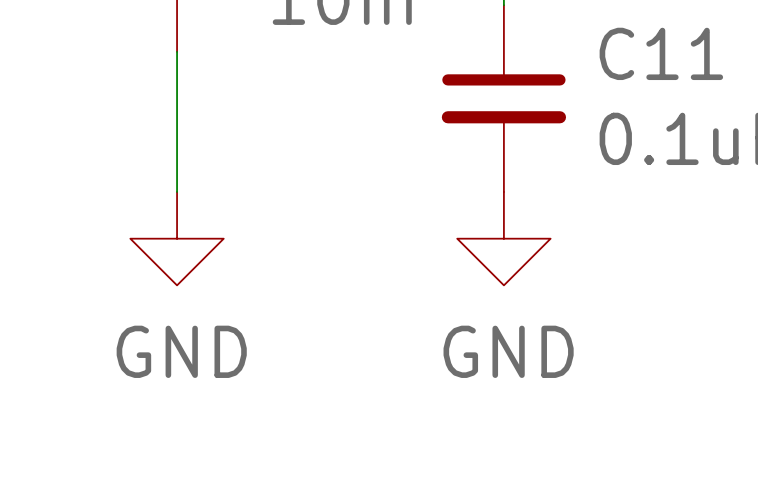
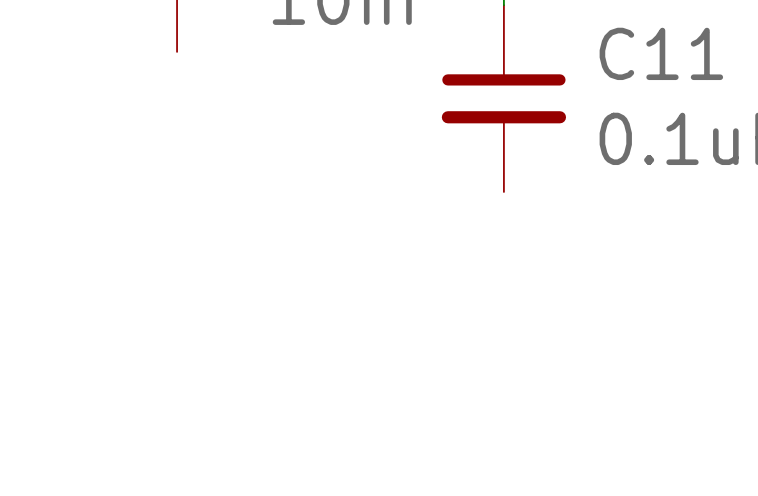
wire: (177, 51) (177, 191) -> none
power symbol: GND (177, 238) -> none
power symbol: GND (503, 238) -> none

